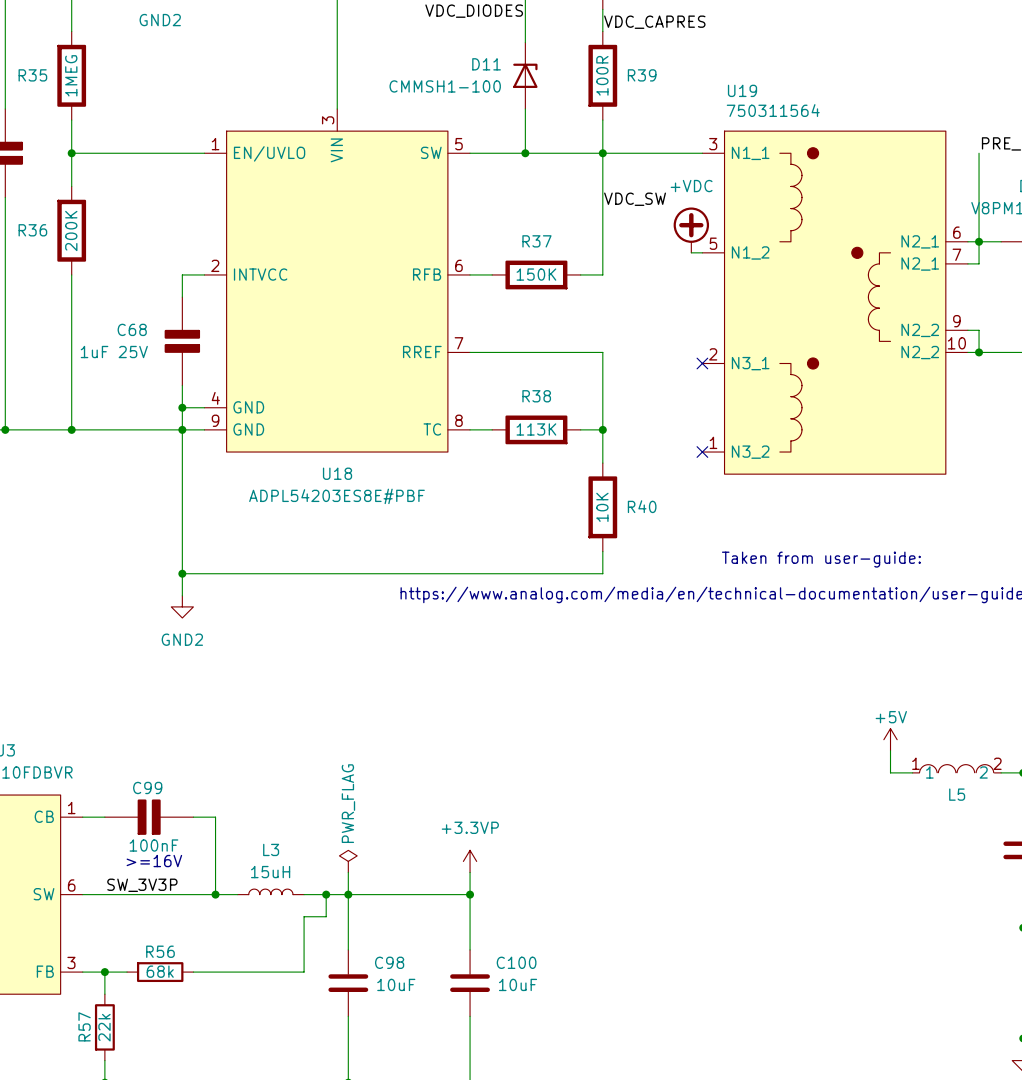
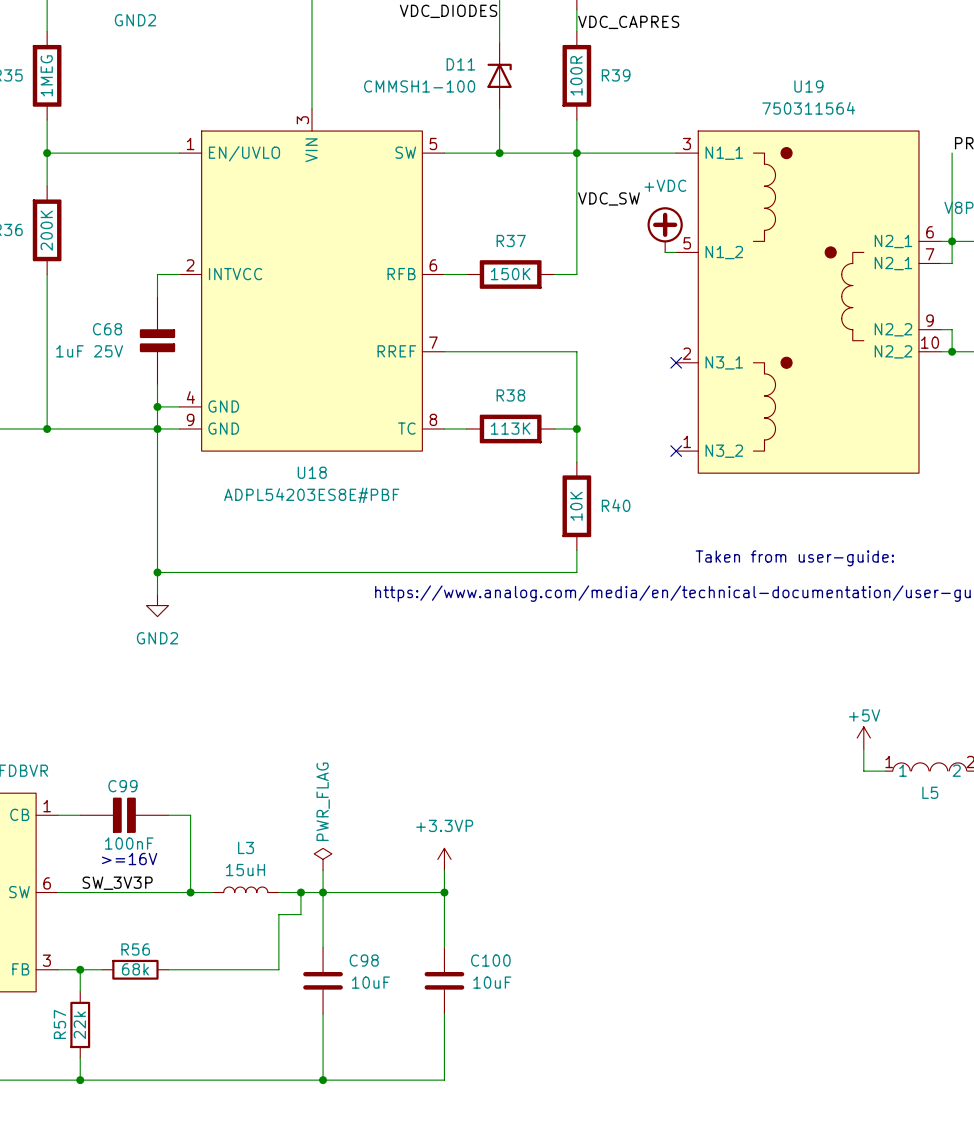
U19 name position: U19 (742, 90) -> U19 (808, 86)
U19 value position: 750311564 (773, 110) -> 750311564 (808, 108)

